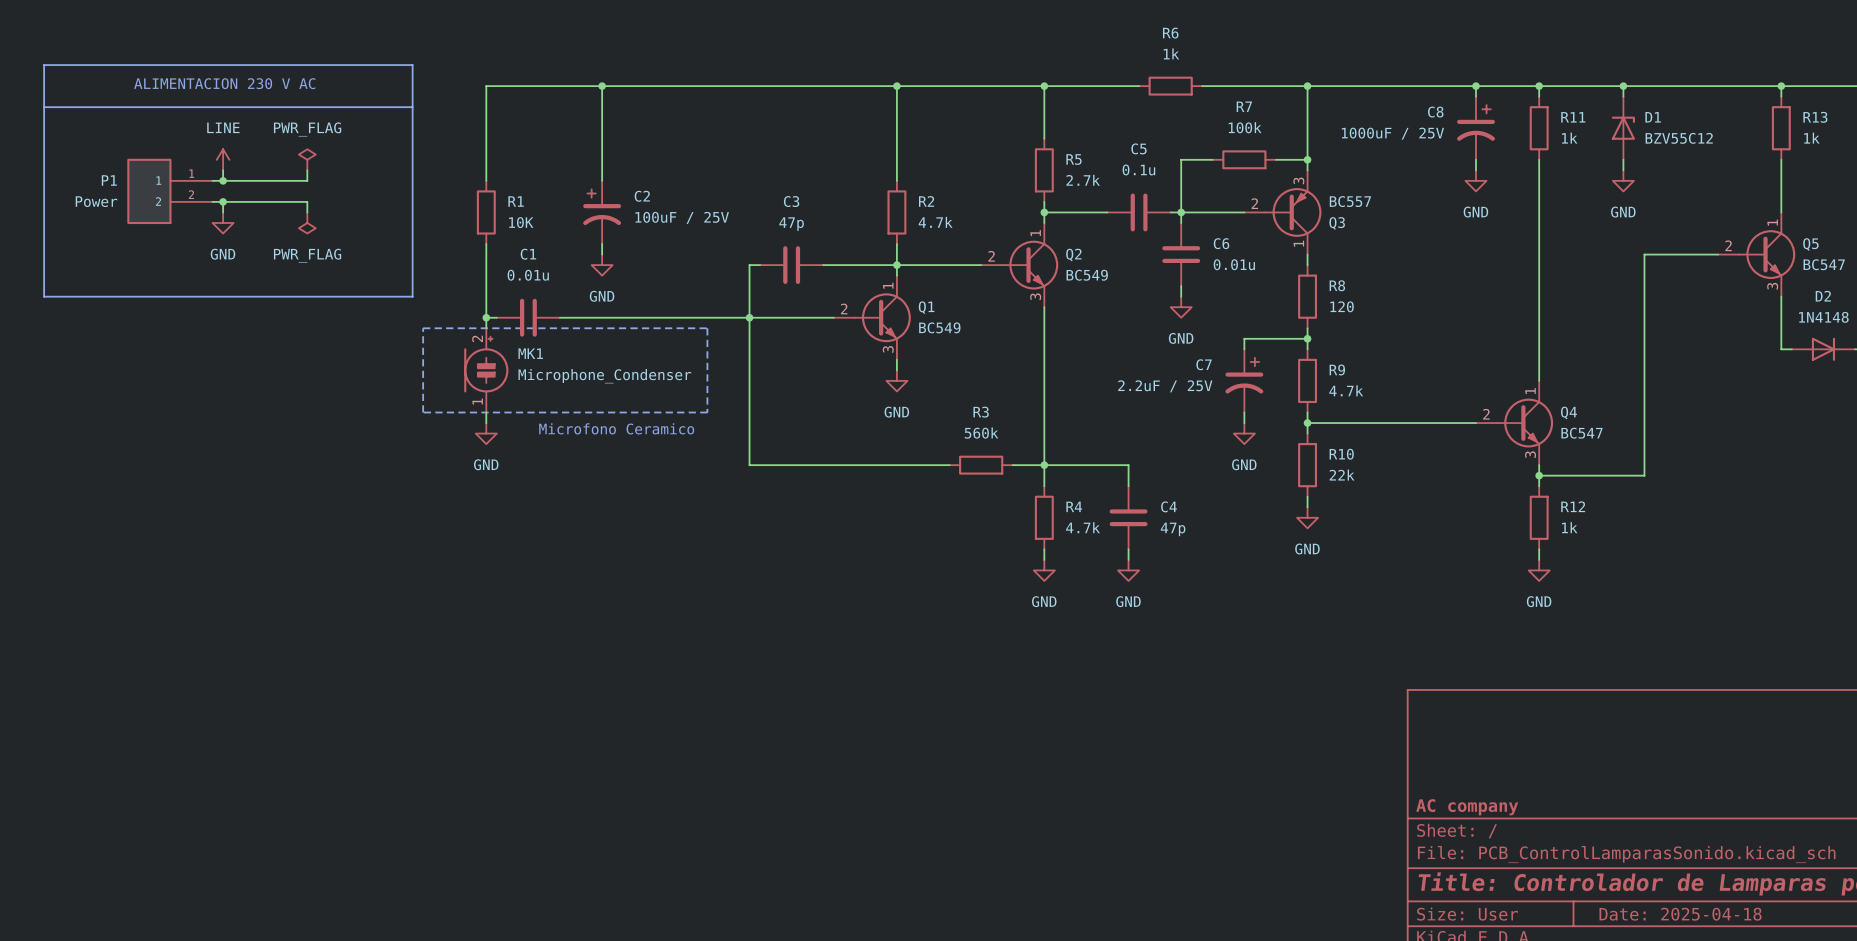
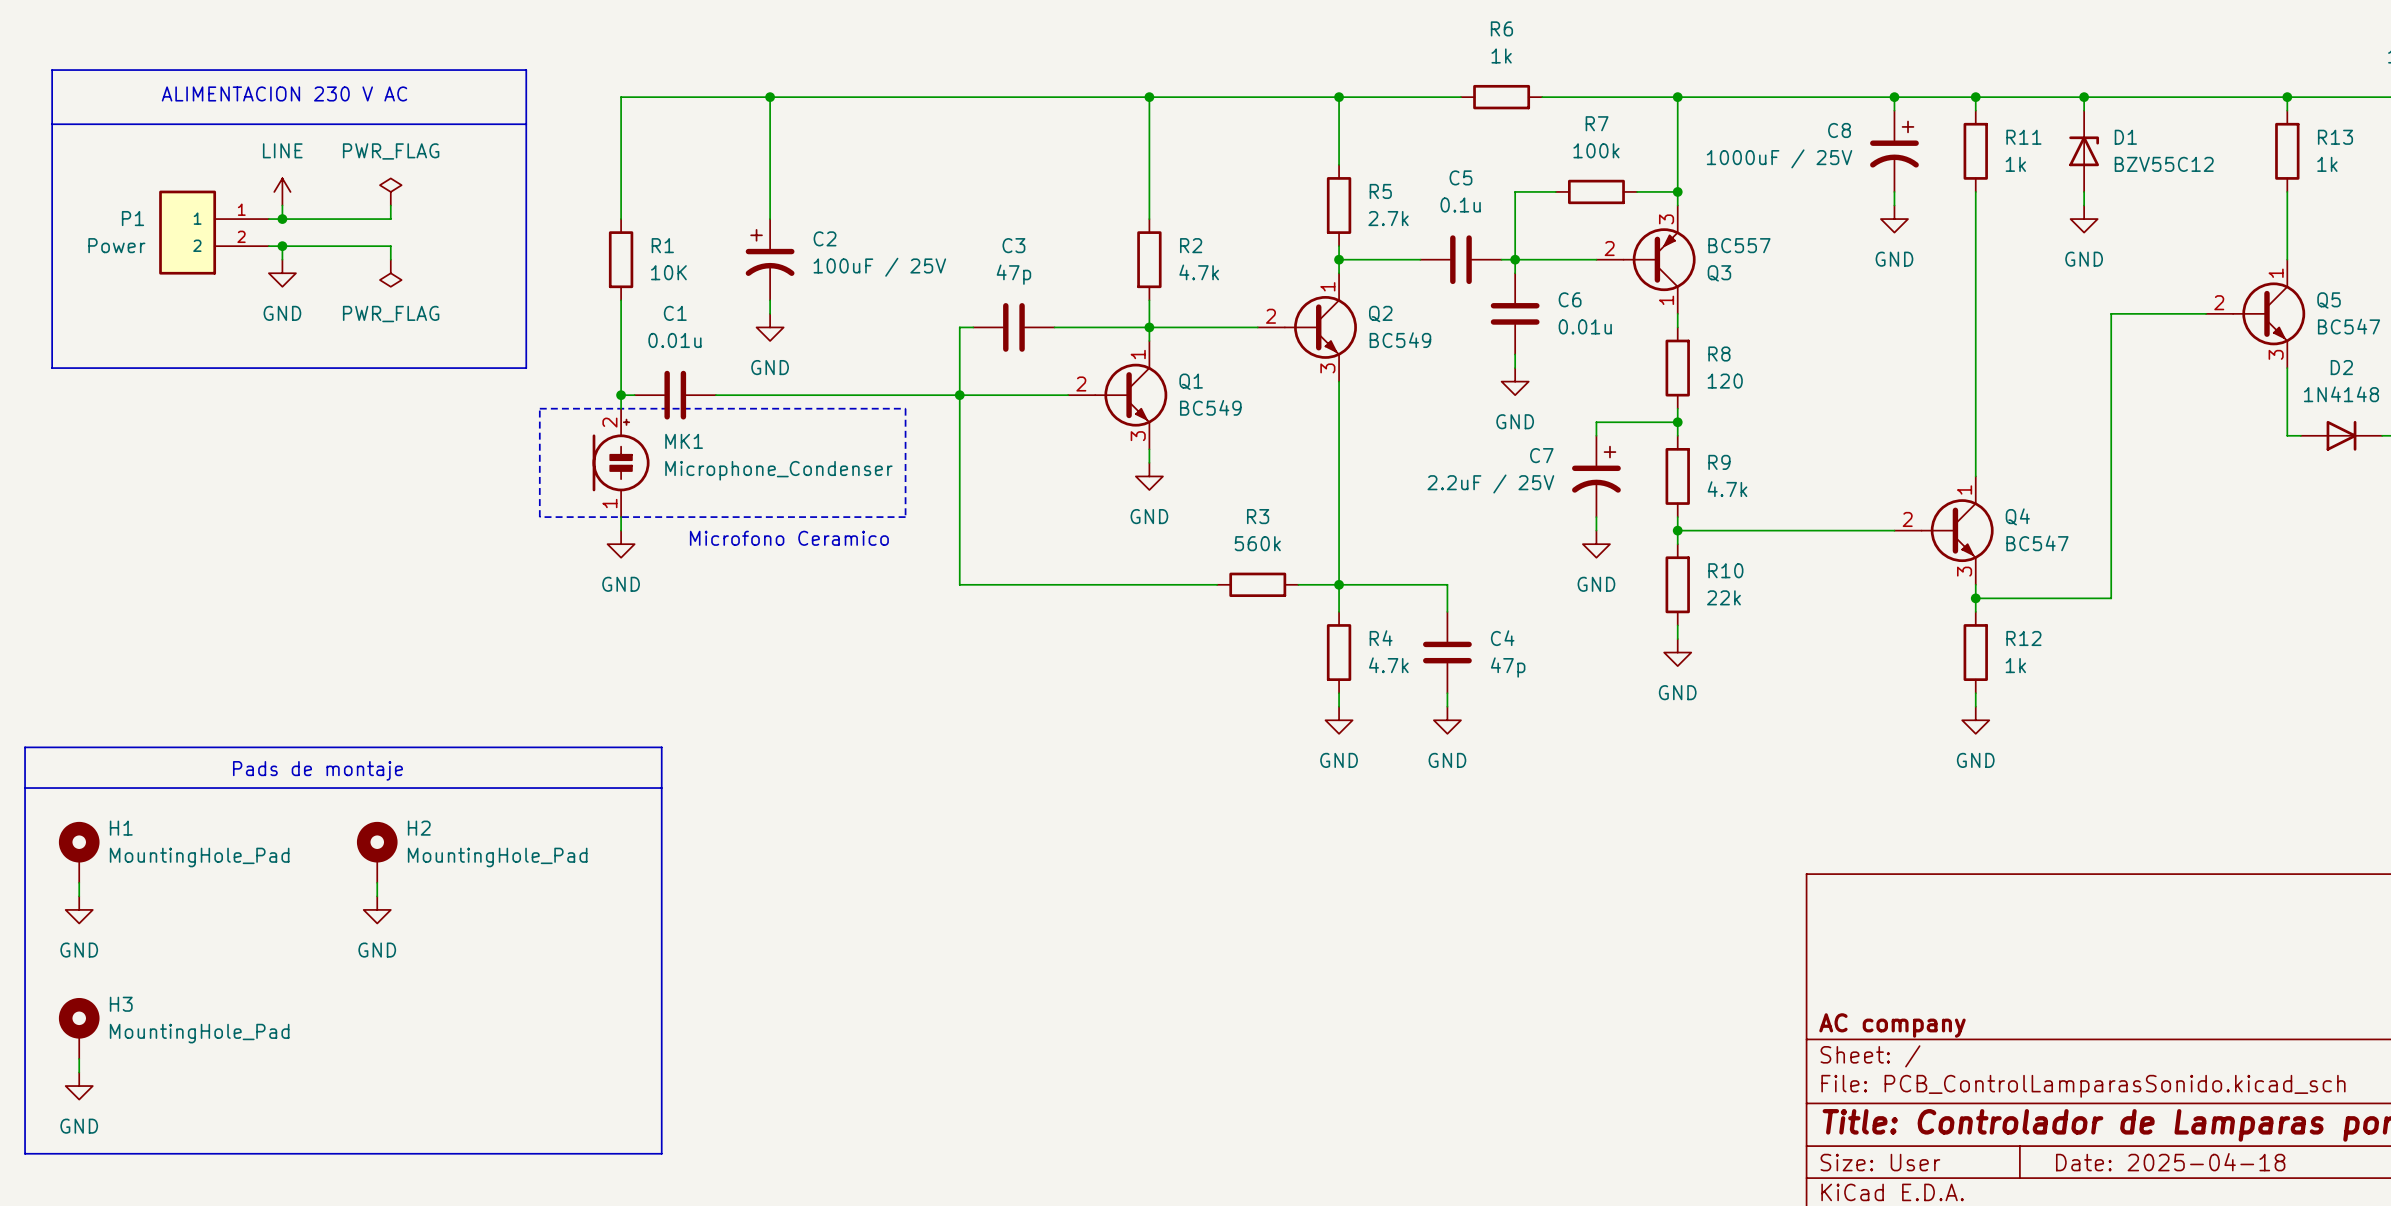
line: none -> (25, 747) (661, 747) (661, 1153) (25, 1153) (25, 747)
text: none -> Pads de montaje (317, 770)
line: none -> (25, 788) (661, 788)
H1: none -> MountingHole_Pad (79, 852)
H2: none -> MountingHole_Pad (377, 852)
wire: none -> (79, 882) (79, 896)
wire: none -> (377, 882) (377, 896)
power symbol: none -> GND (79, 909)
power symbol: none -> GND (377, 909)
H3: none -> MountingHole_Pad (79, 1028)
wire: none -> (79, 1058) (79, 1072)
power symbol: none -> GND (79, 1086)

